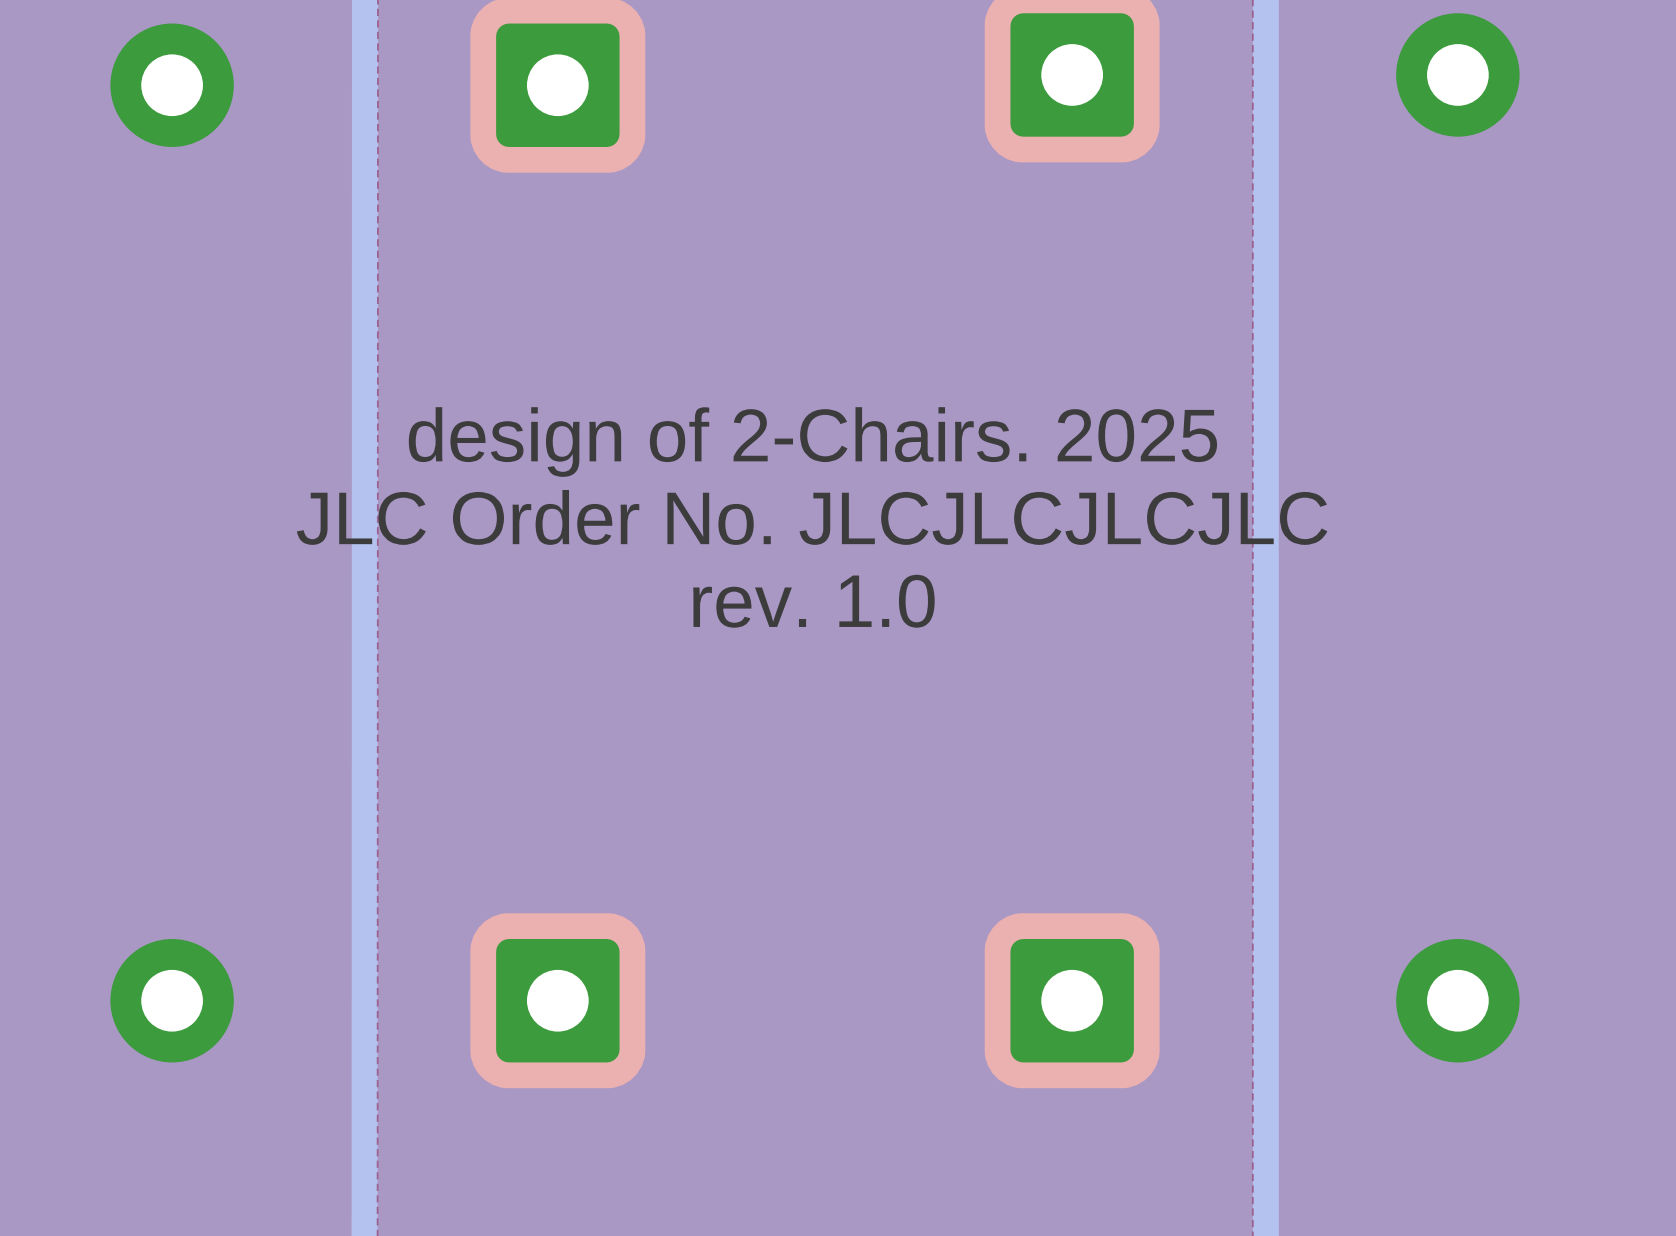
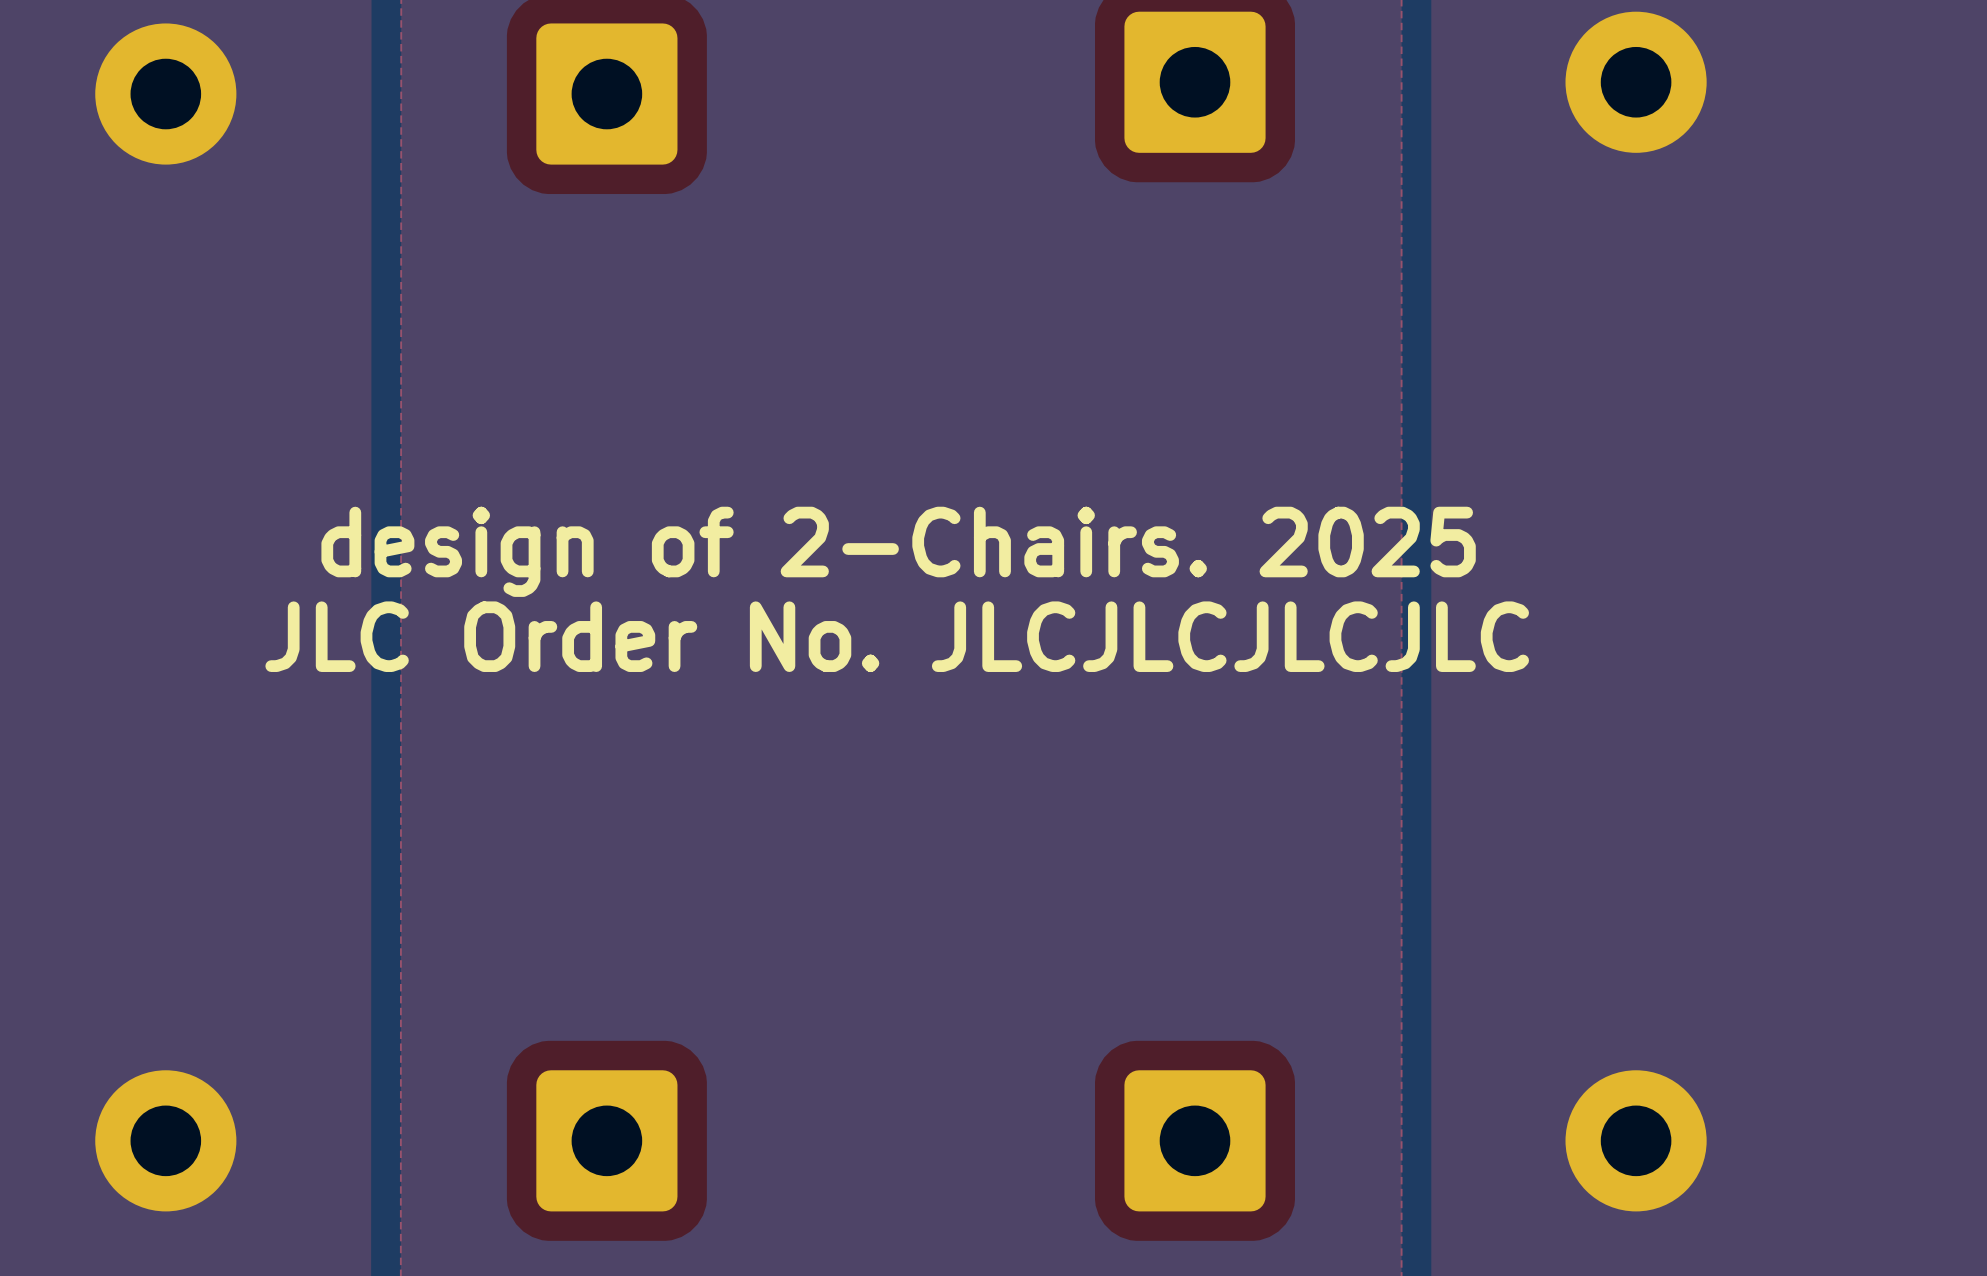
text position: design of 2-Chairs. 2025 (812, 442) -> design of 2-Chairs. 2025 (898, 551)
text position: JLC Order No. JLCJLCJLCJLC (812, 517) -> JLC Order No. JLCJLCJLCJLC (897, 636)
text: rev. 1.0 (813, 601) -> none

